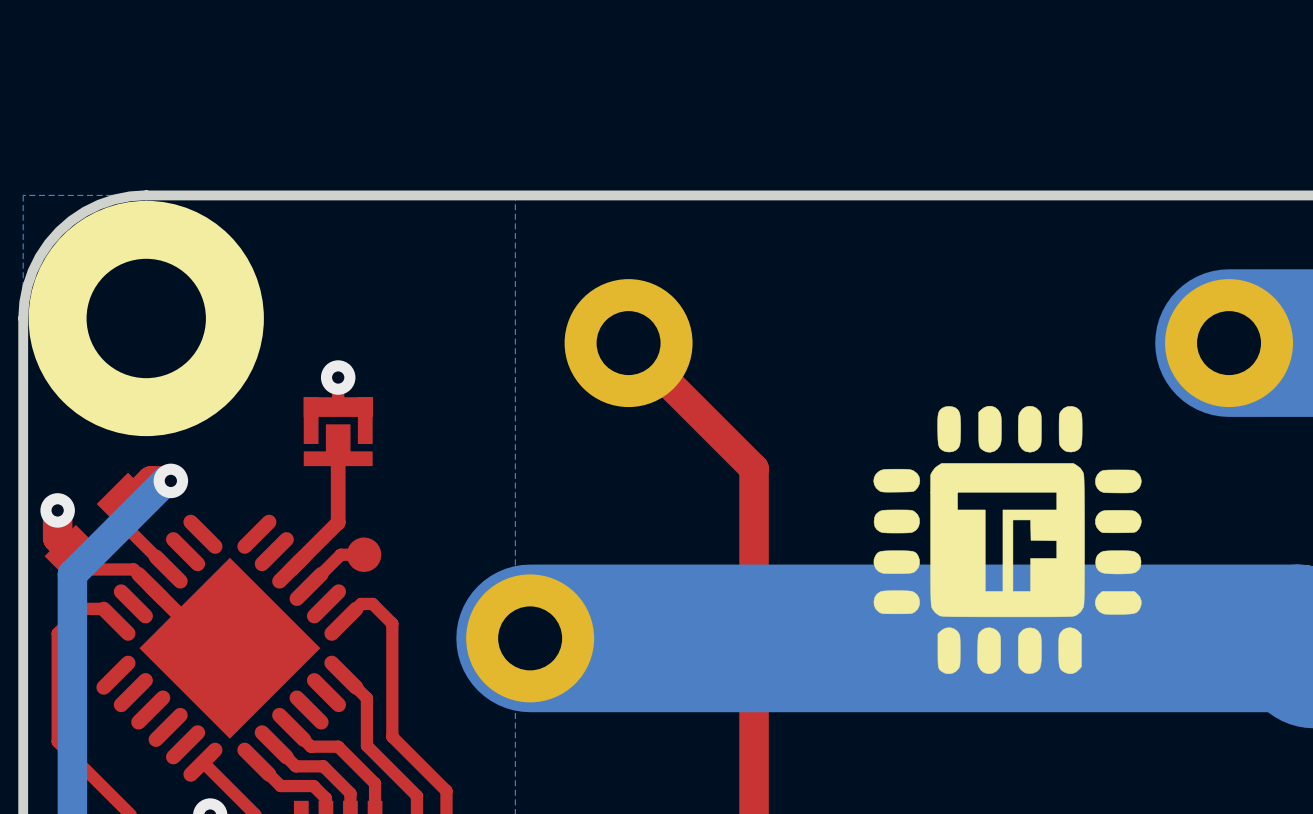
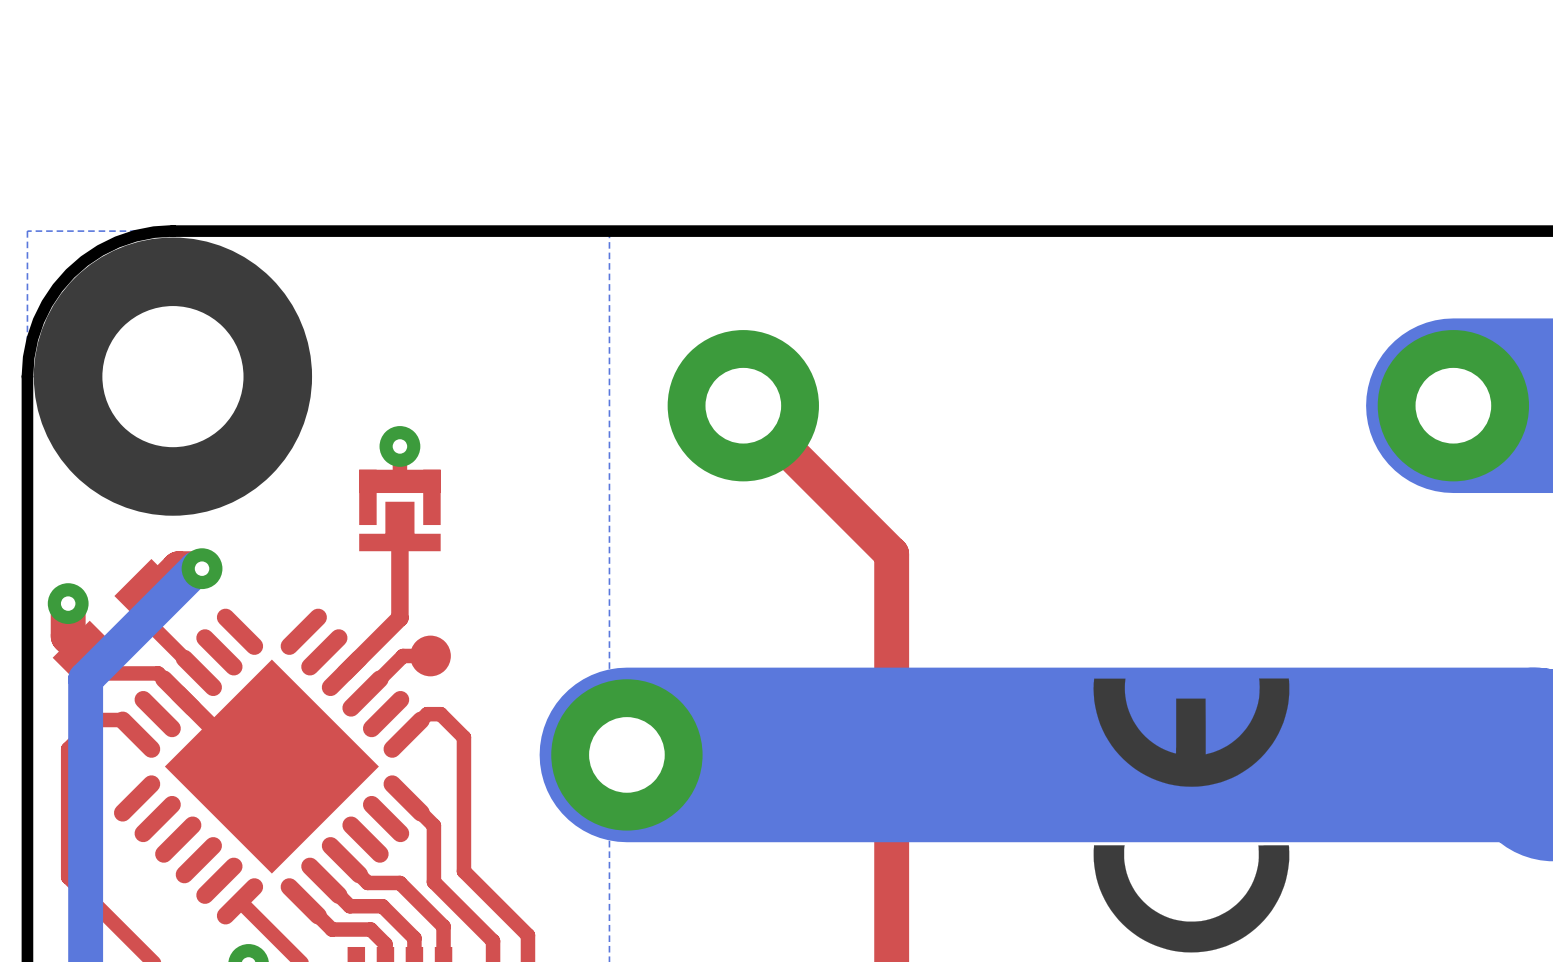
drawing: [873, 405, 1142, 675] -> none
drawing: none -> [1093, 678, 1290, 953]

